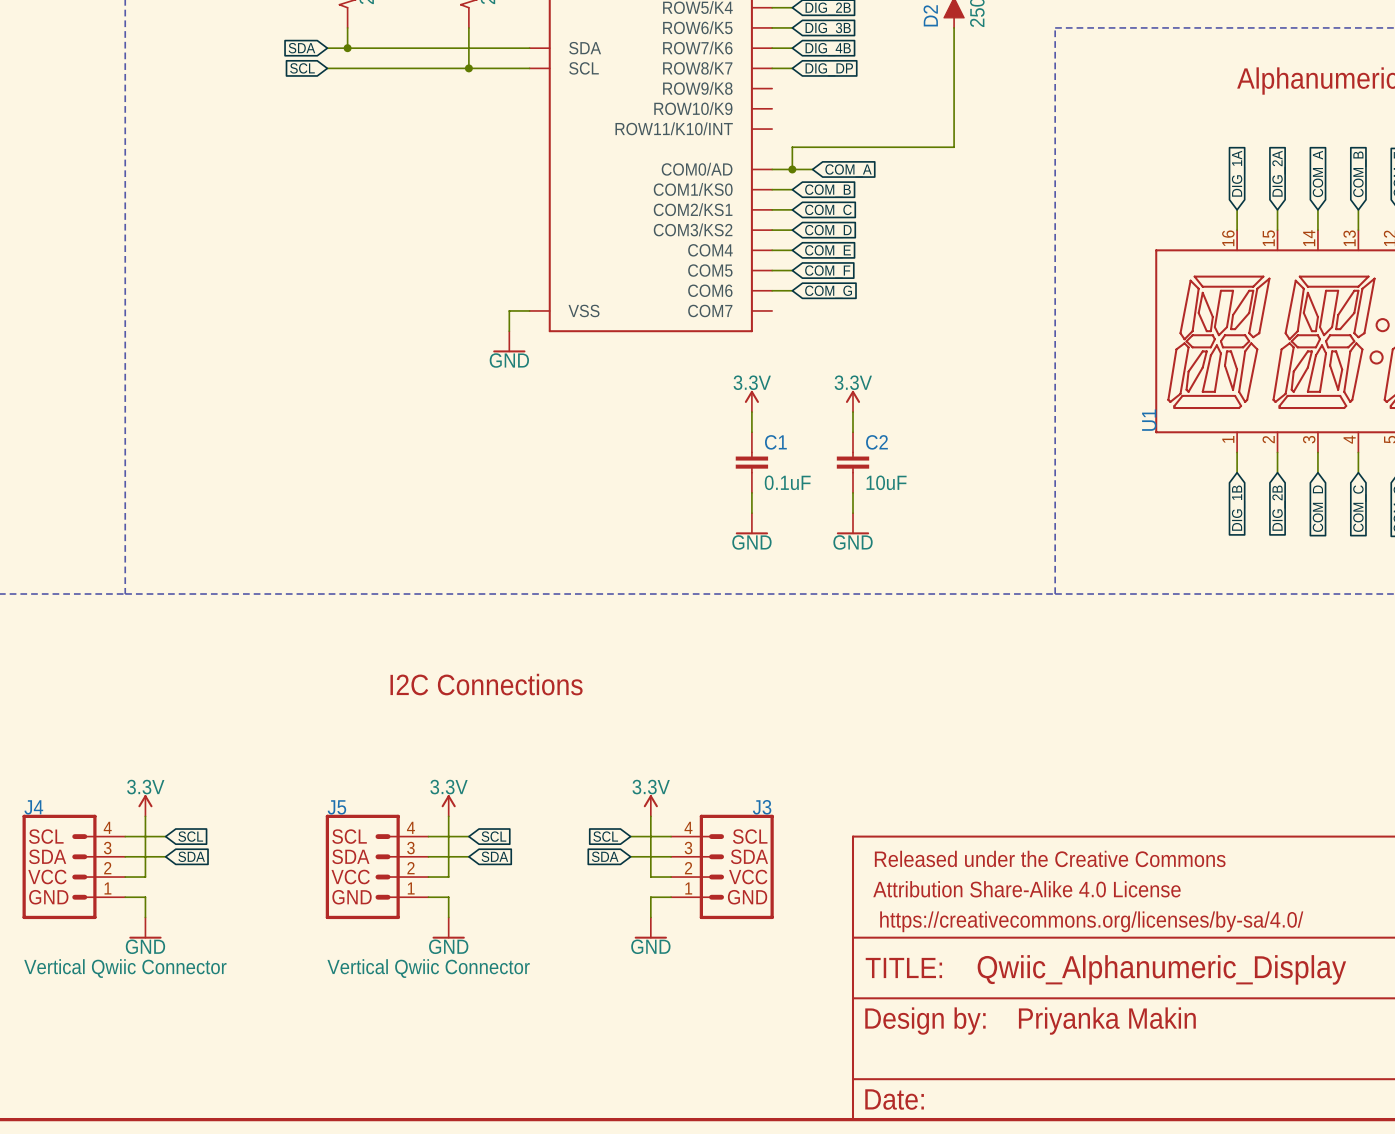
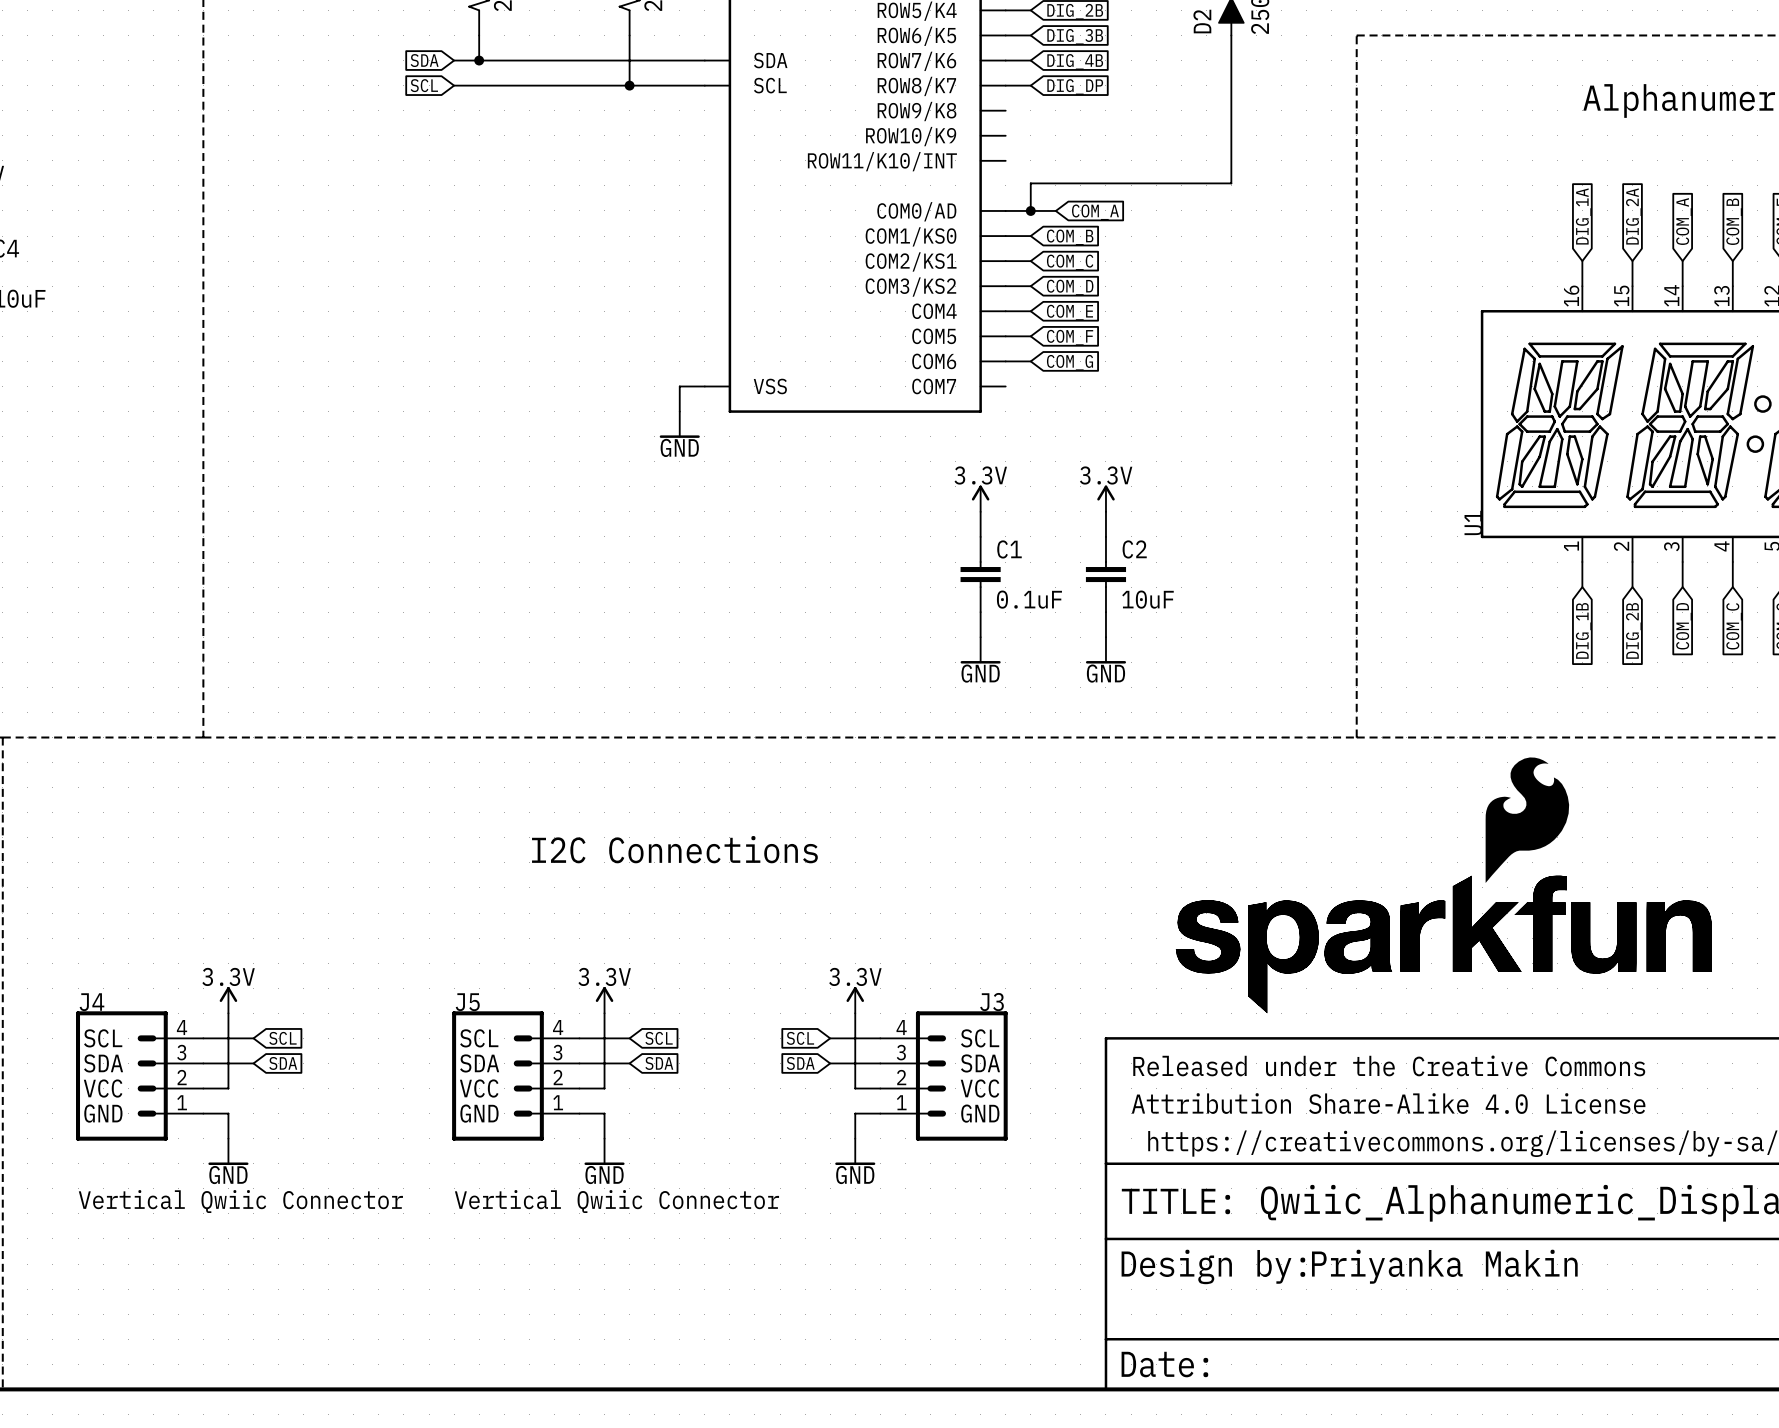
part: none -> (1527, 820)
part: none -> (1443, 944)

